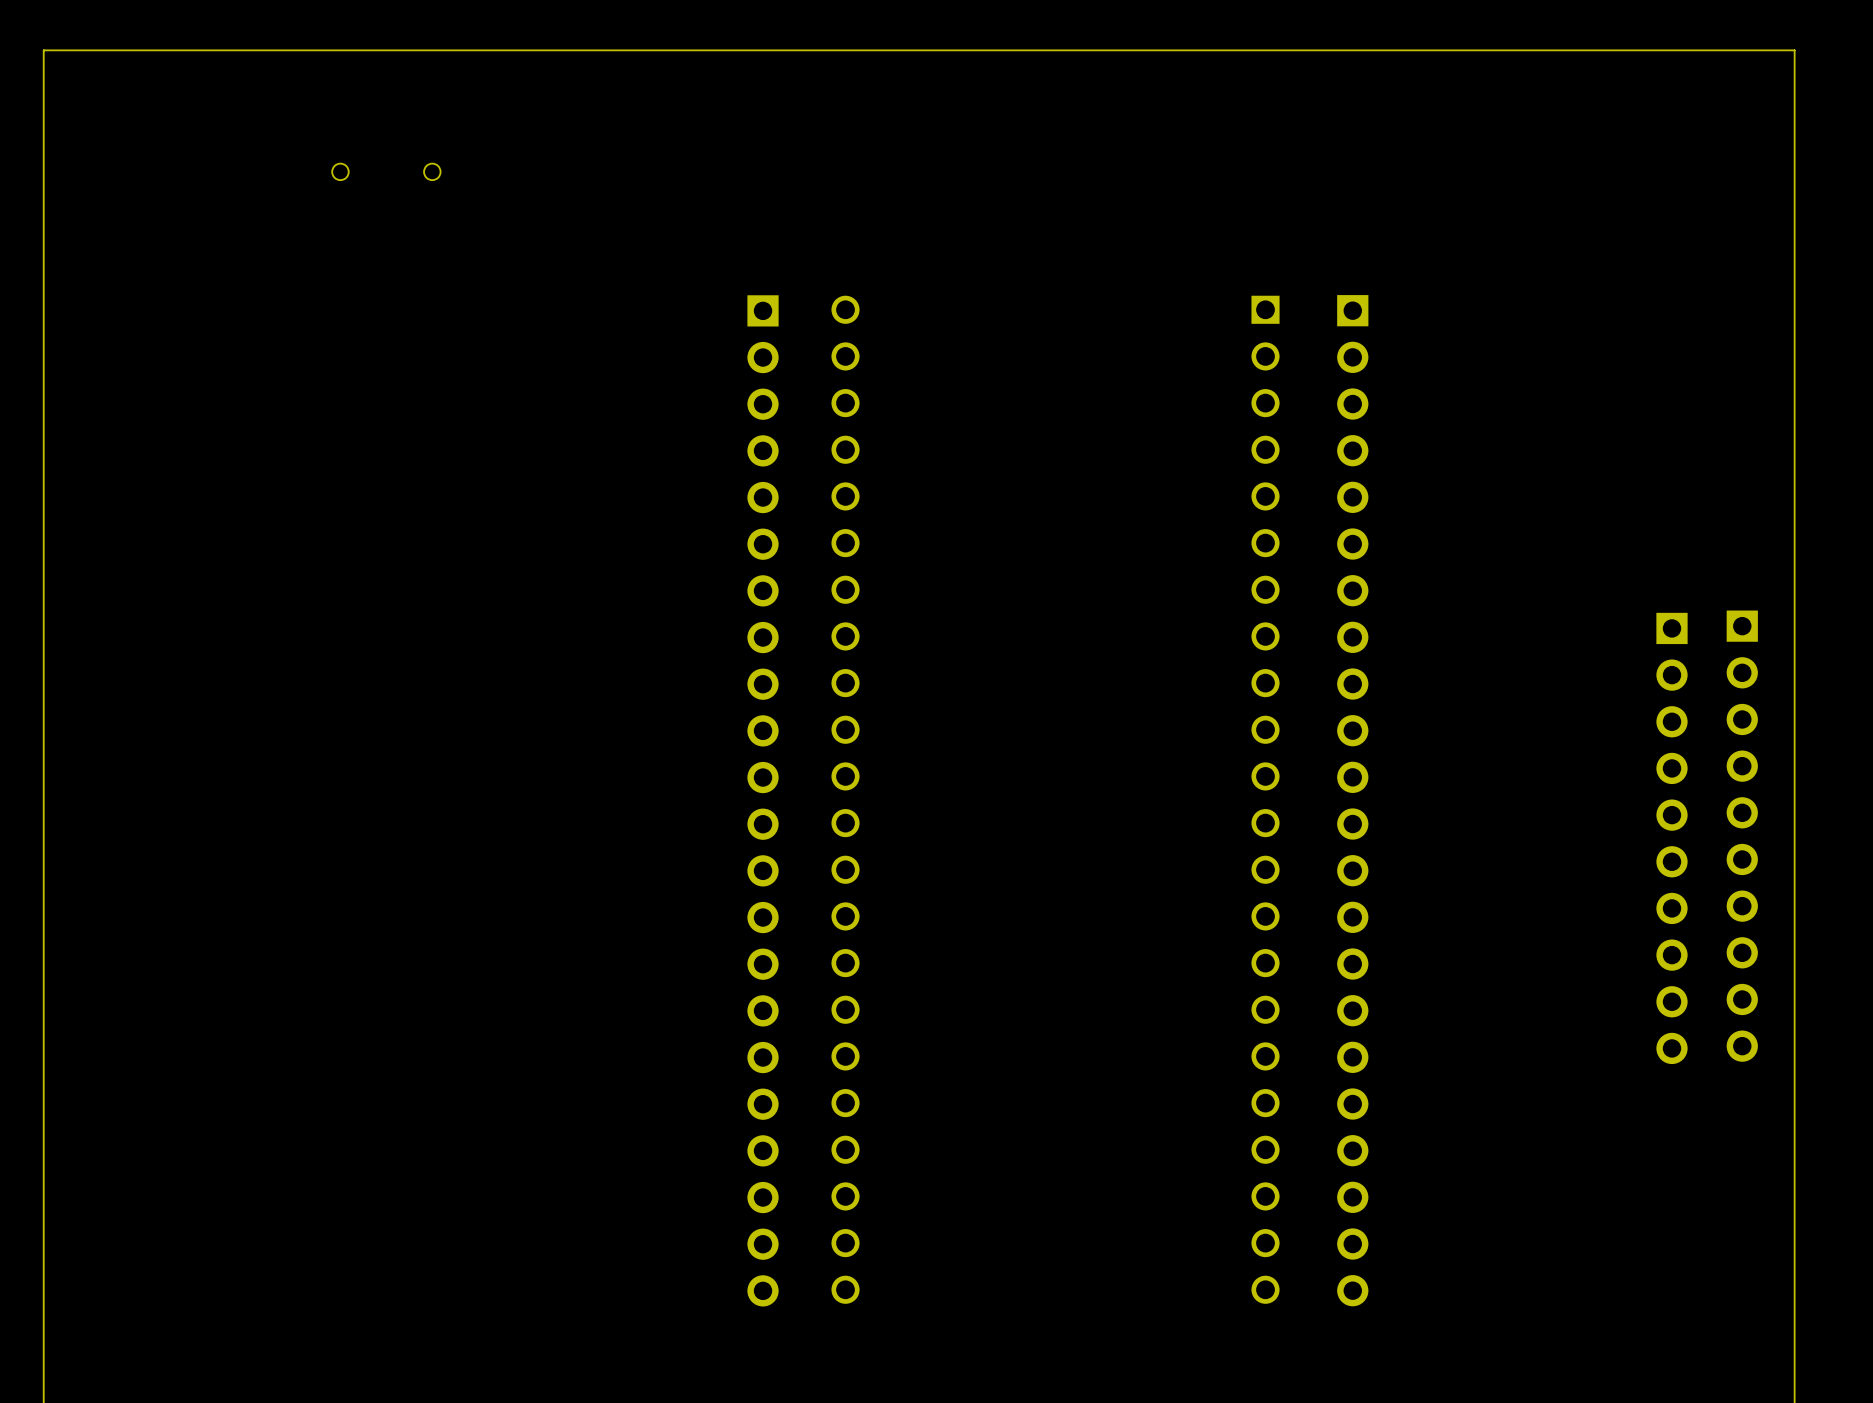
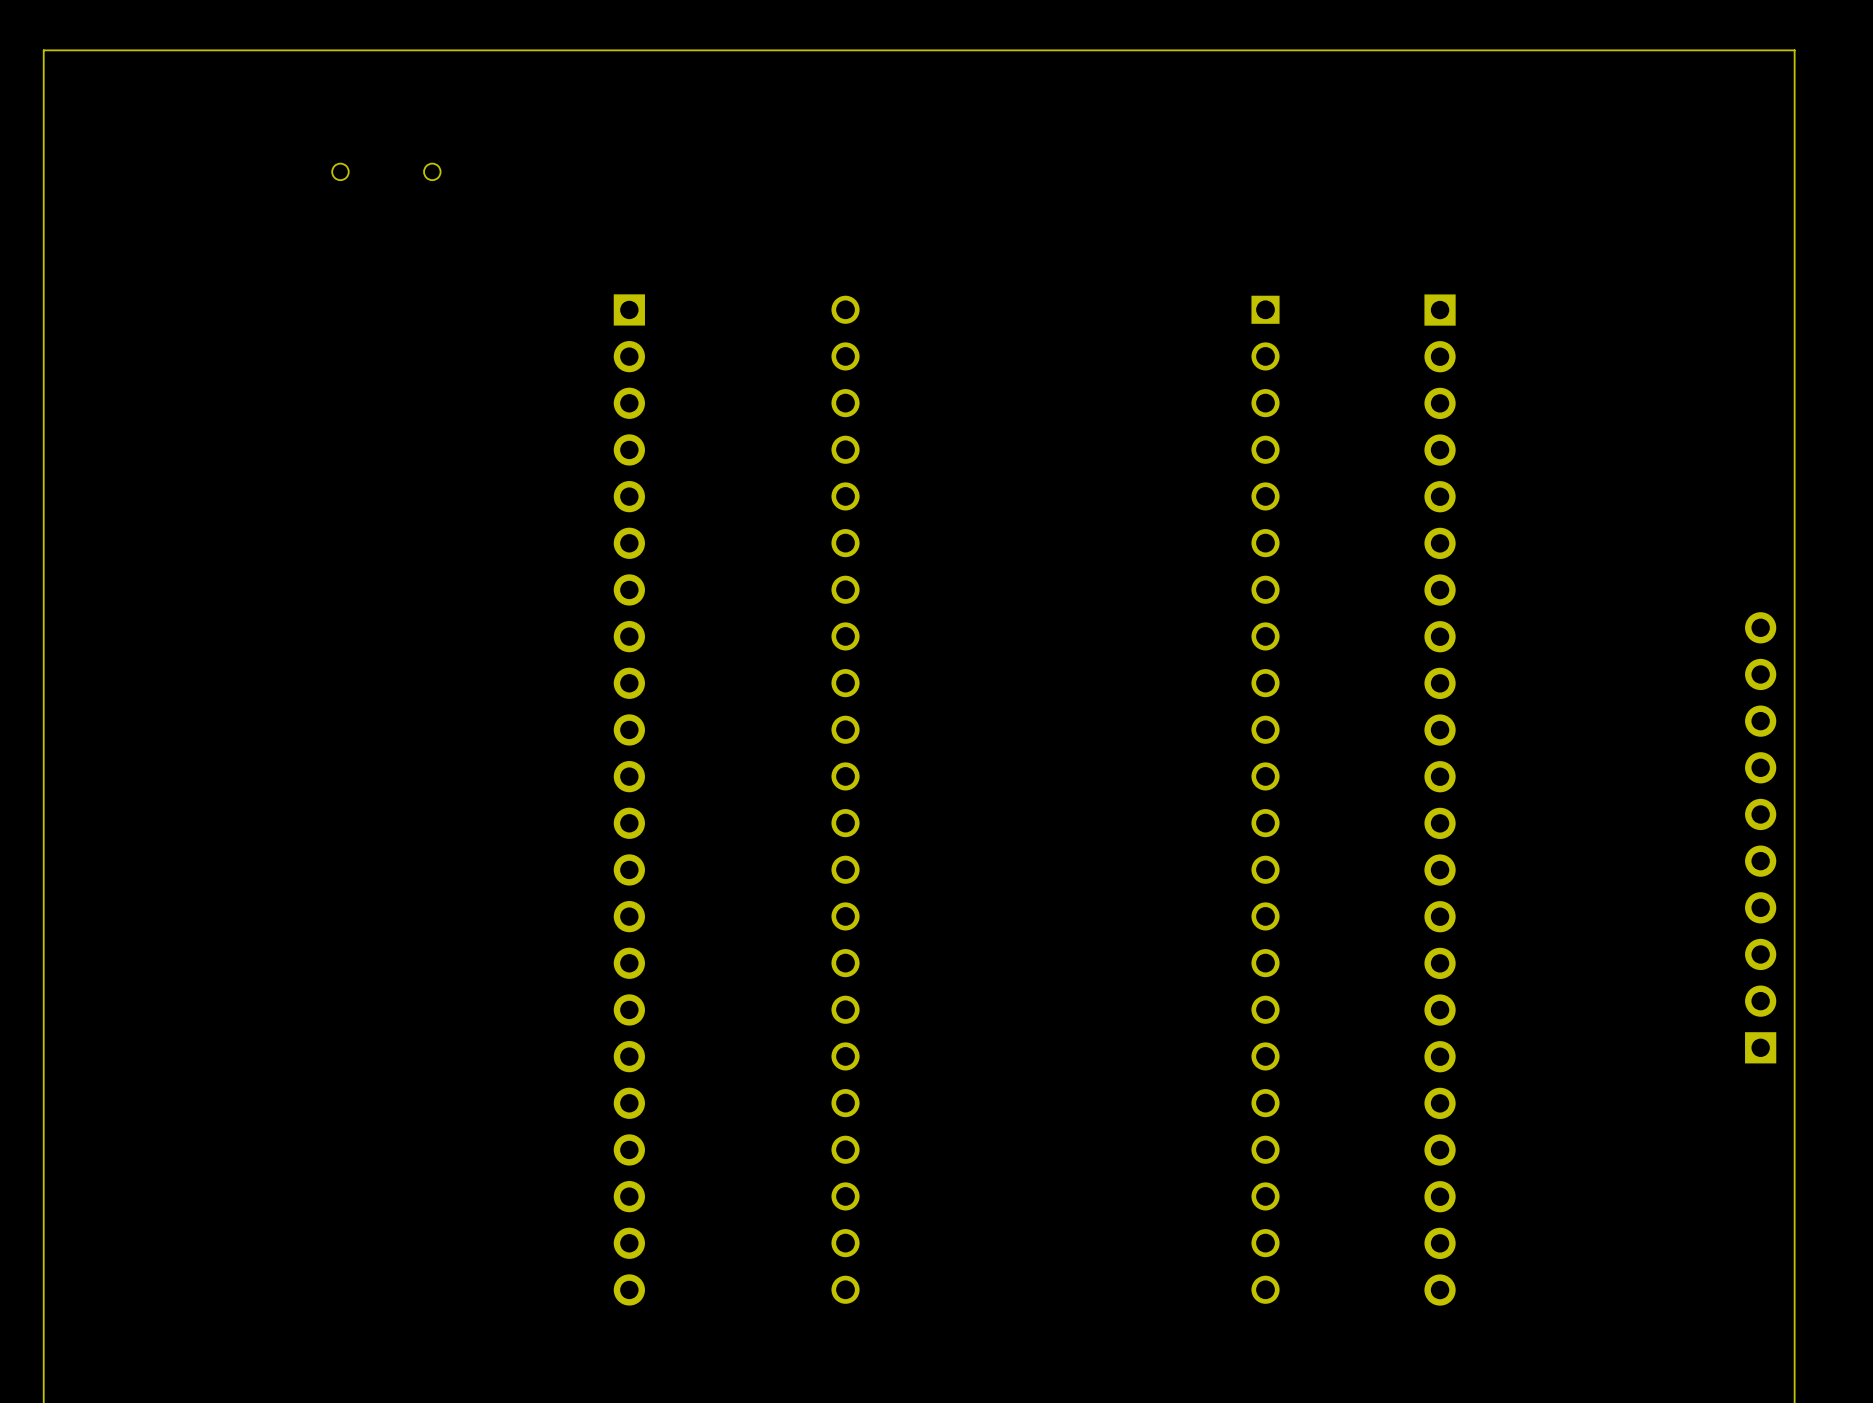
part position: (763, 800) -> (629, 799)
part position: (1352, 800) -> (1440, 800)
part rotation: 0° (1742, 836) -> 180° (1760, 837)
part: (1672, 838) -> none

